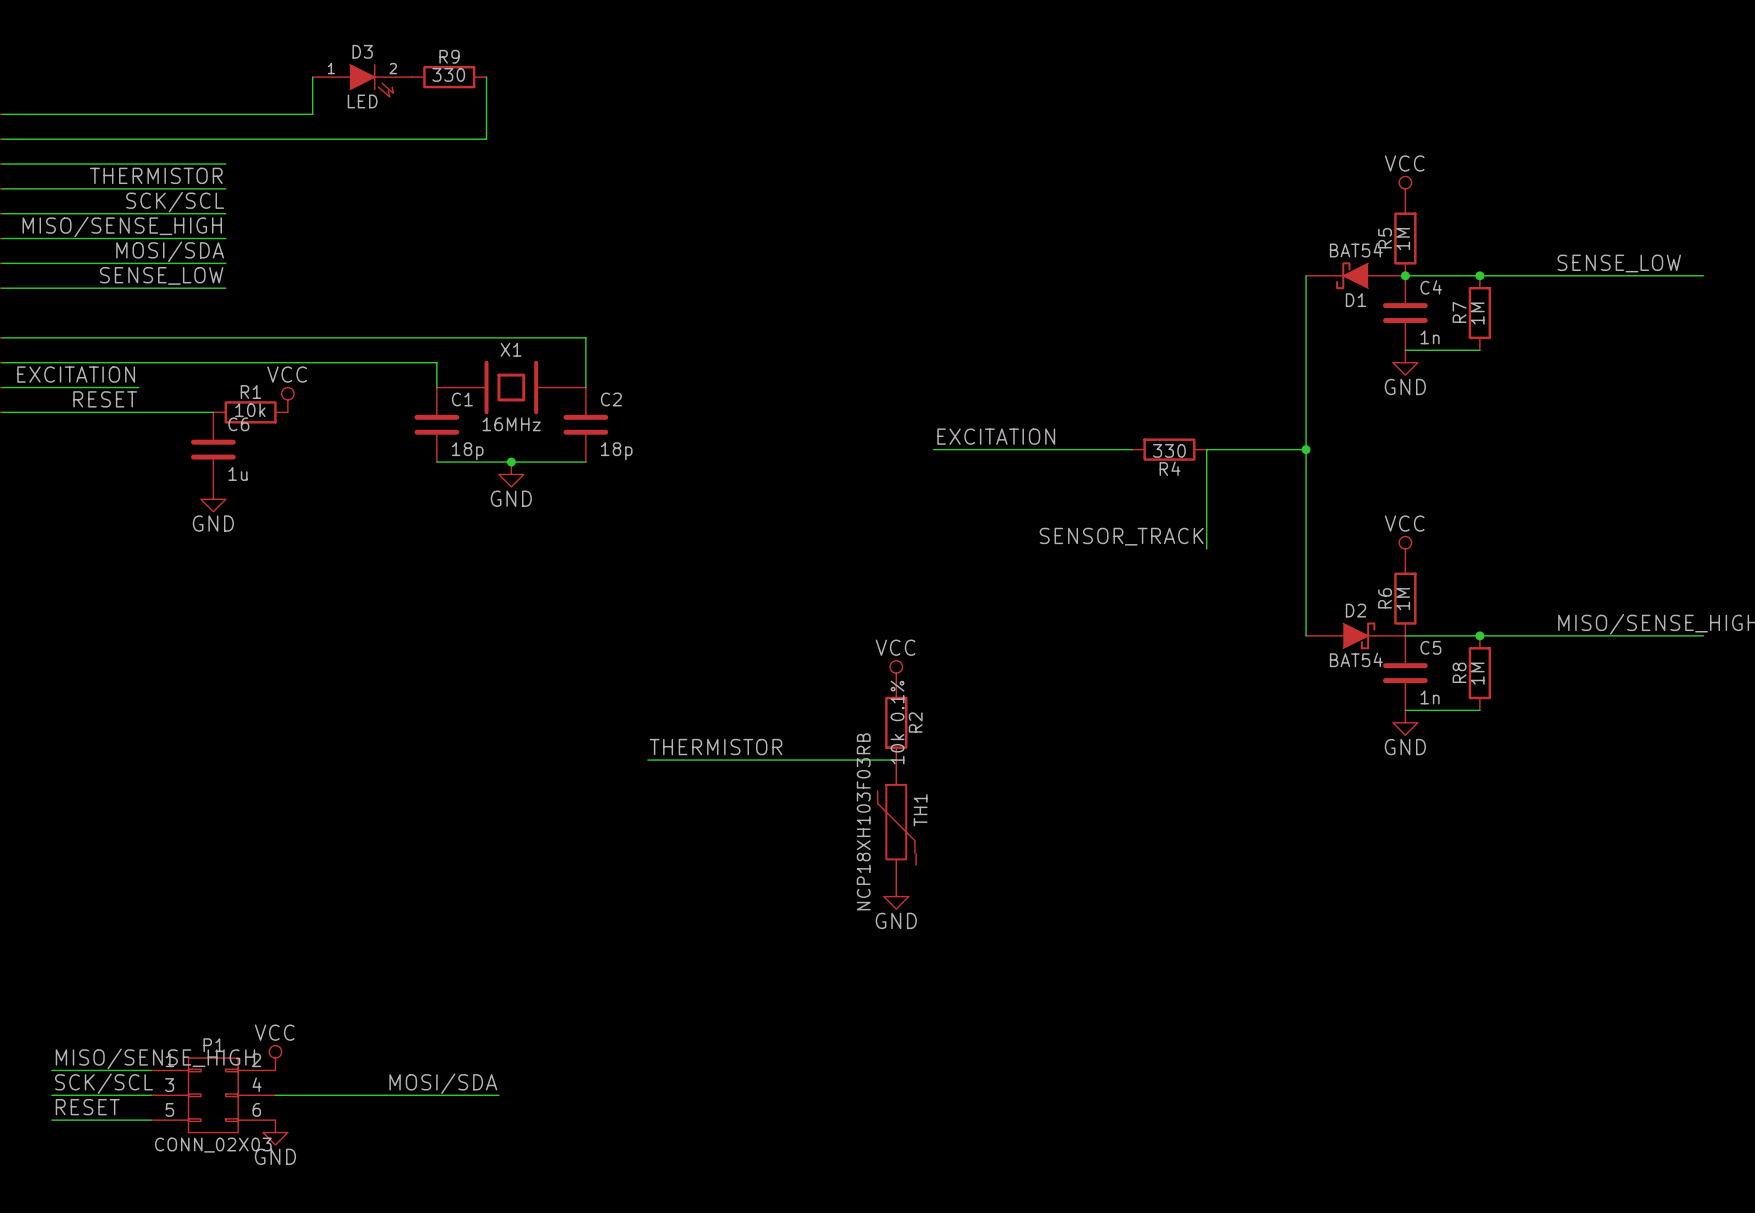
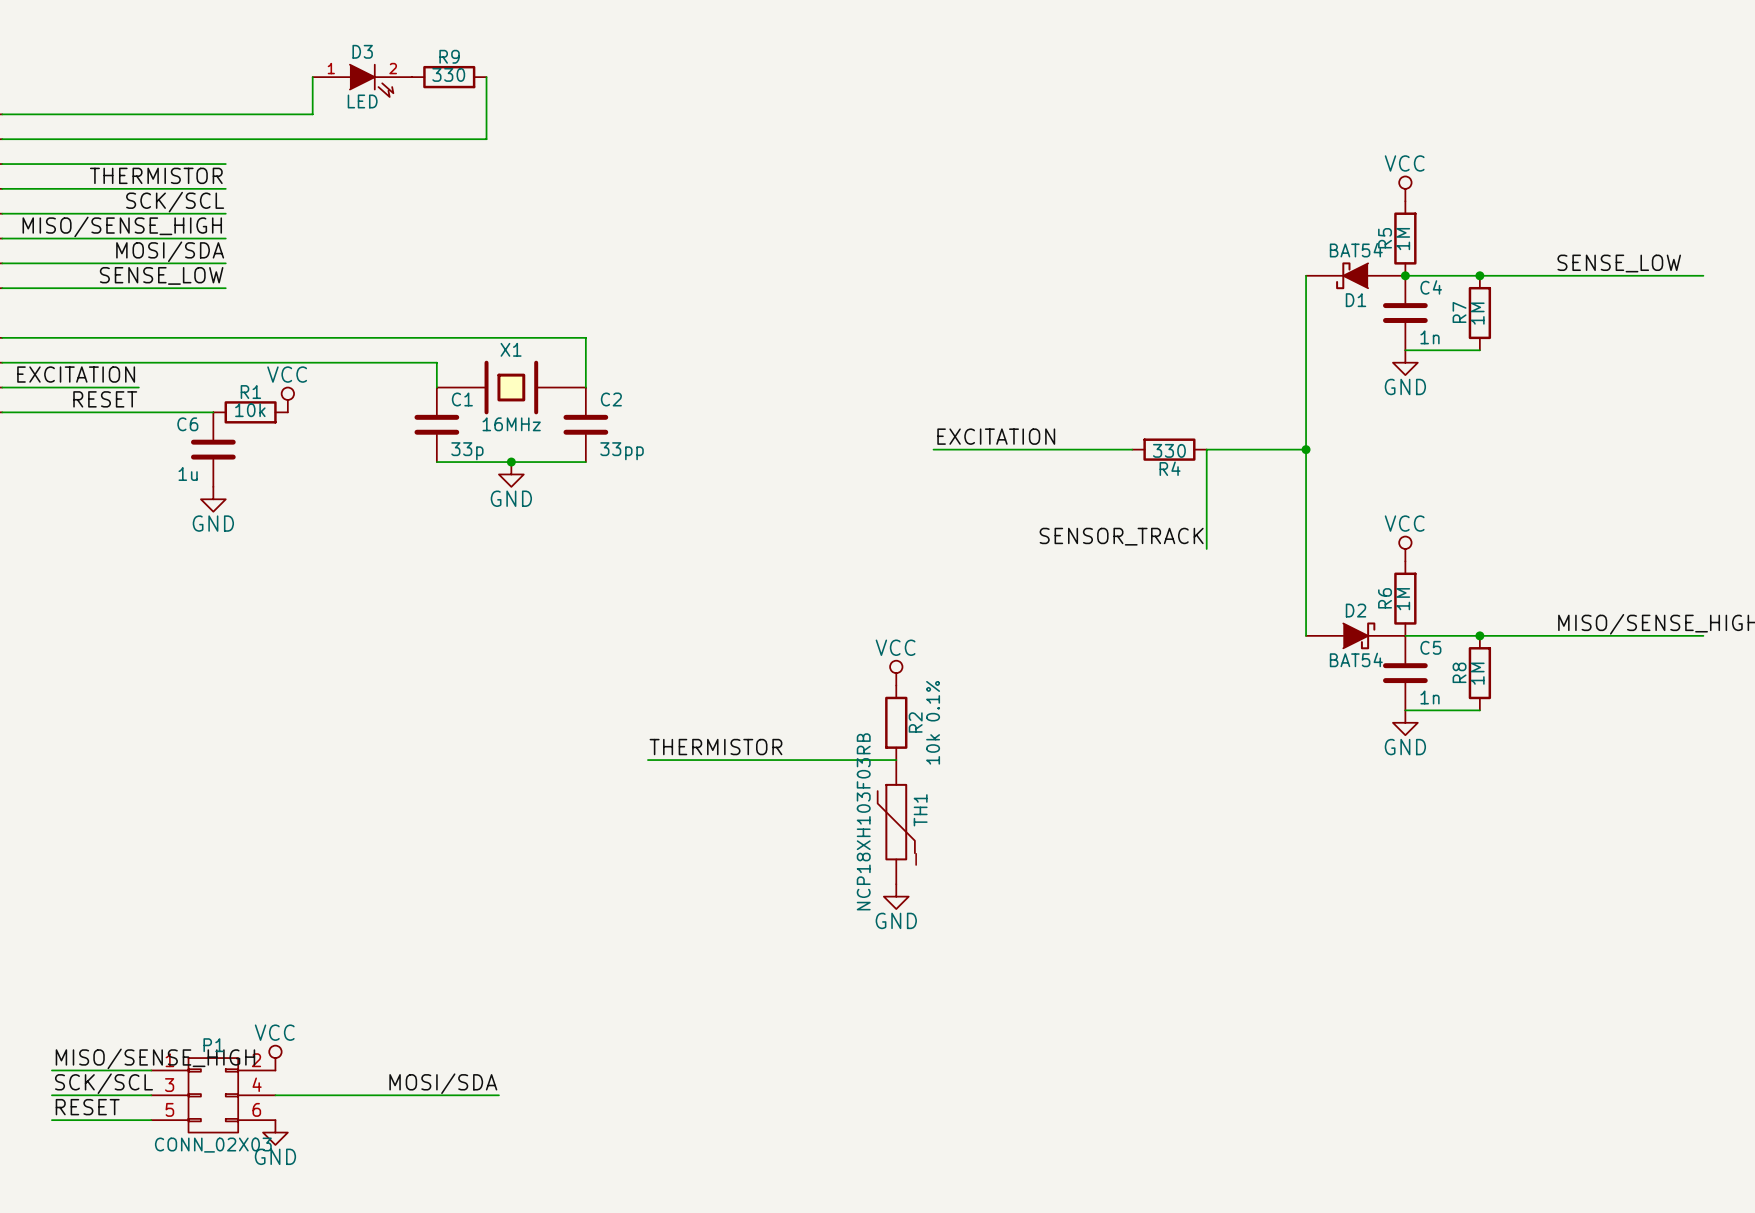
C6 name position: C6 (238, 424) -> C6 (187, 424)
C1 value: 18p (467, 451) -> 33p (467, 451)
C2 value: 18p (616, 451) -> 33pp (622, 451)
C6 value position: 1u (237, 473) -> 1u (188, 473)
R2 value position: 10k 0.1% (897, 722) -> 10k 0.1% (933, 722)

